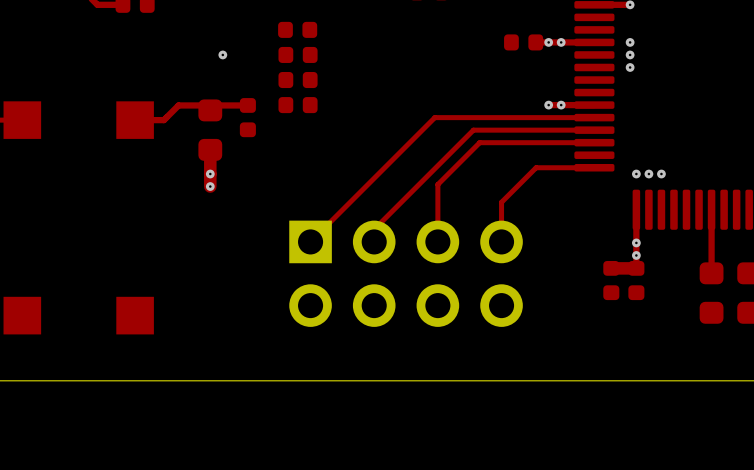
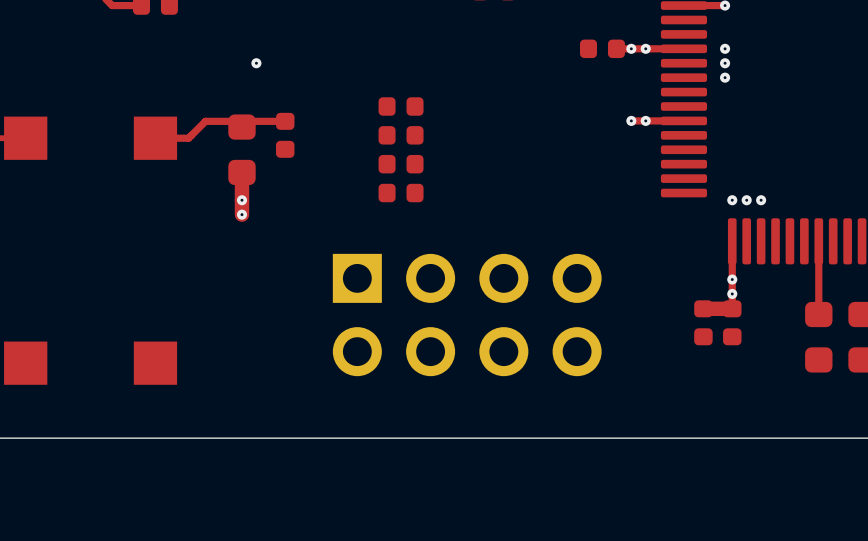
part: (297, 29) -> none
part: (298, 54) -> none
part: (298, 80) -> none
part: none -> (401, 106)
part: (298, 105) -> none
part: none -> (401, 135)
top track: (594, 117) (434, 117) (310, 241) -> none
top track: (594, 130) (473, 130) (374, 229) (374, 241) -> none
part: none -> (401, 164)
top track: (594, 142) (479, 142) (437, 184) (437, 241) -> none
part: none -> (401, 193)
top track: (594, 167) (536, 167) (501, 202) (501, 241) -> none

